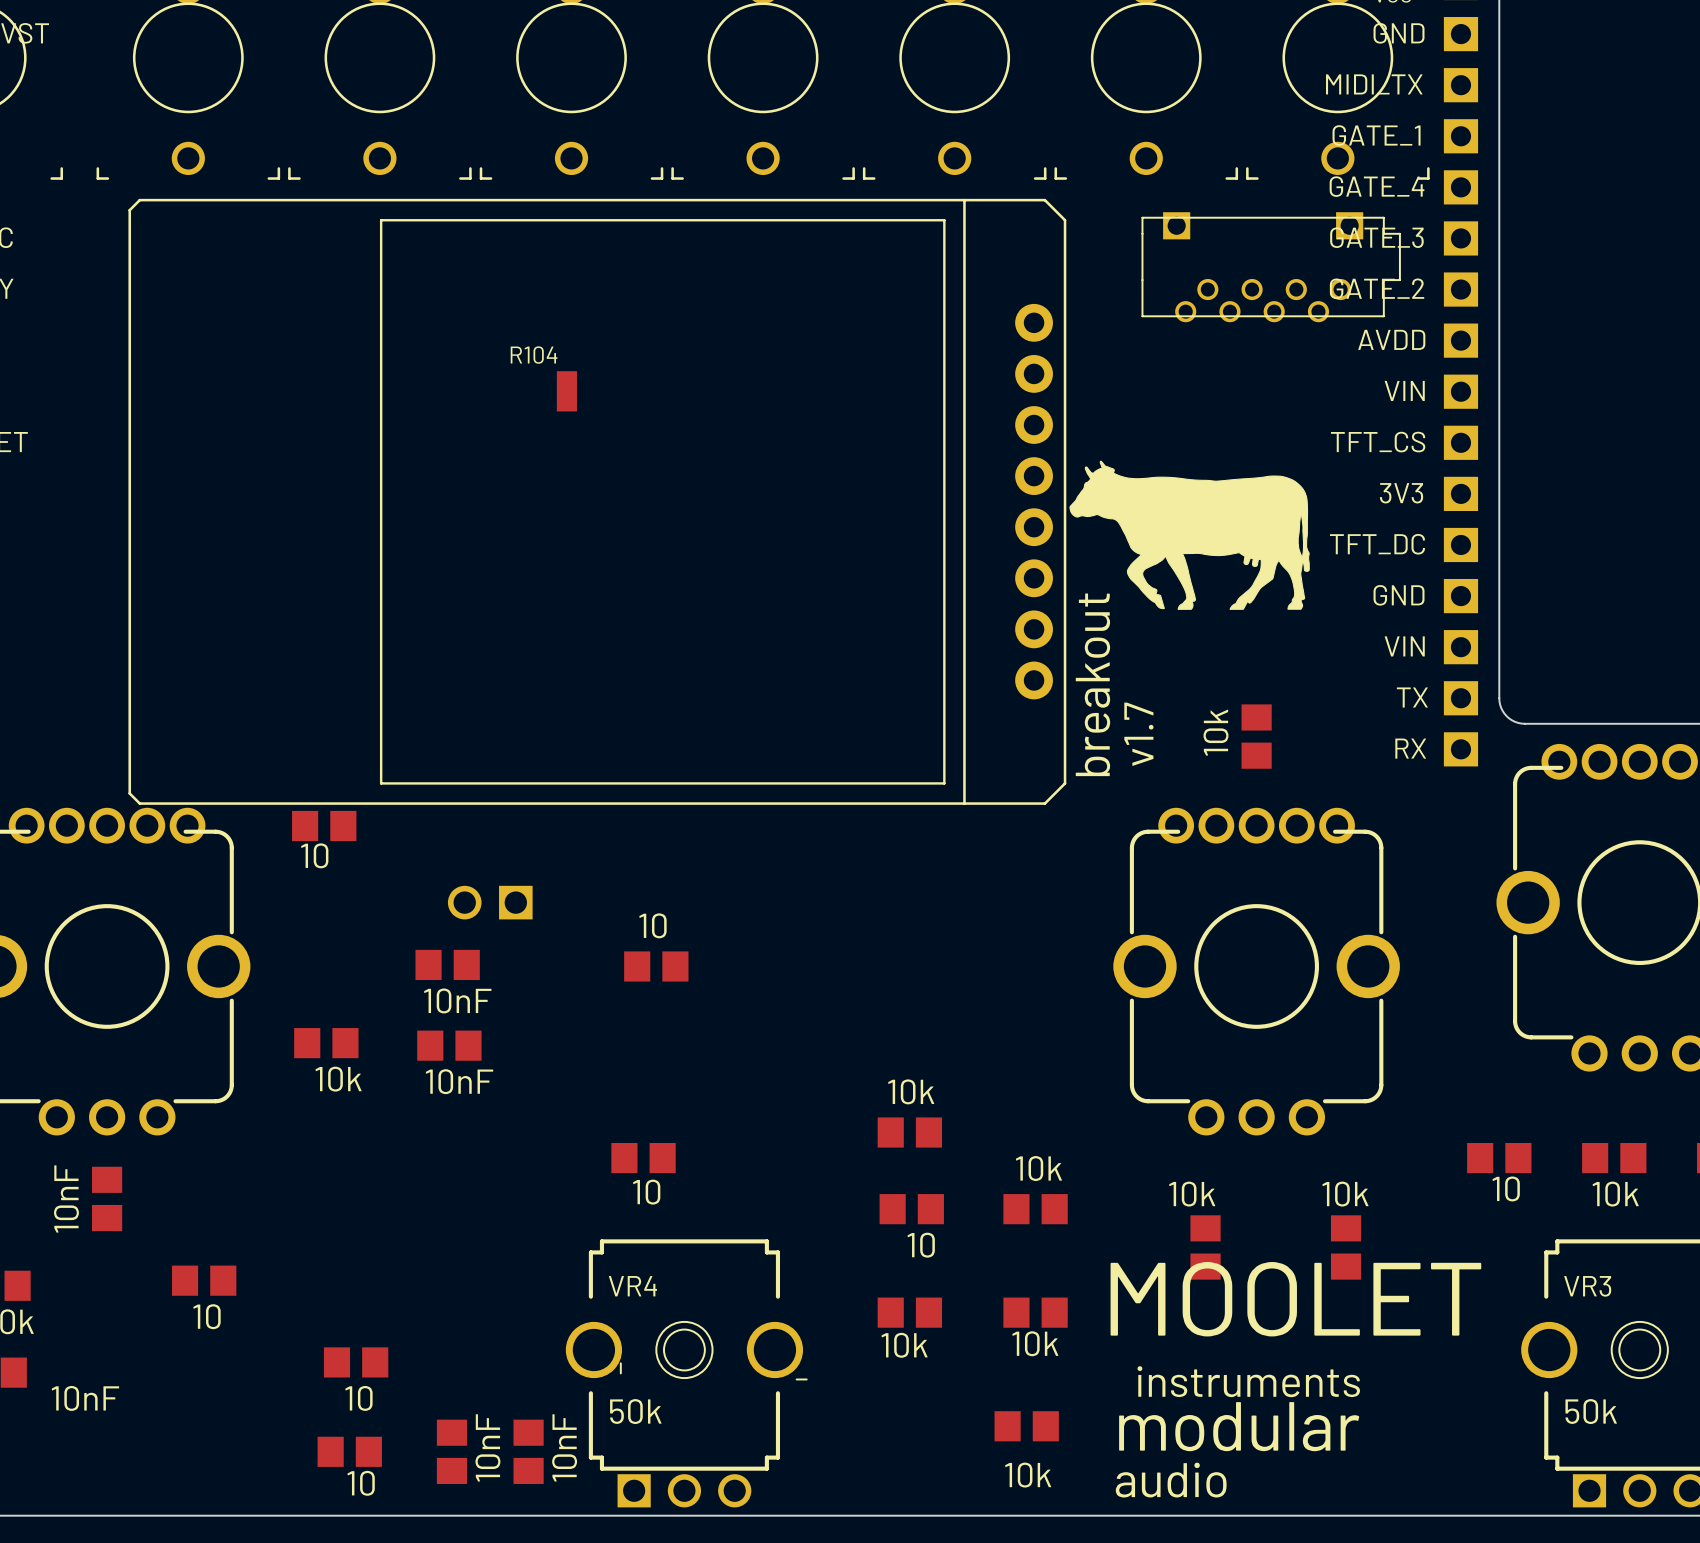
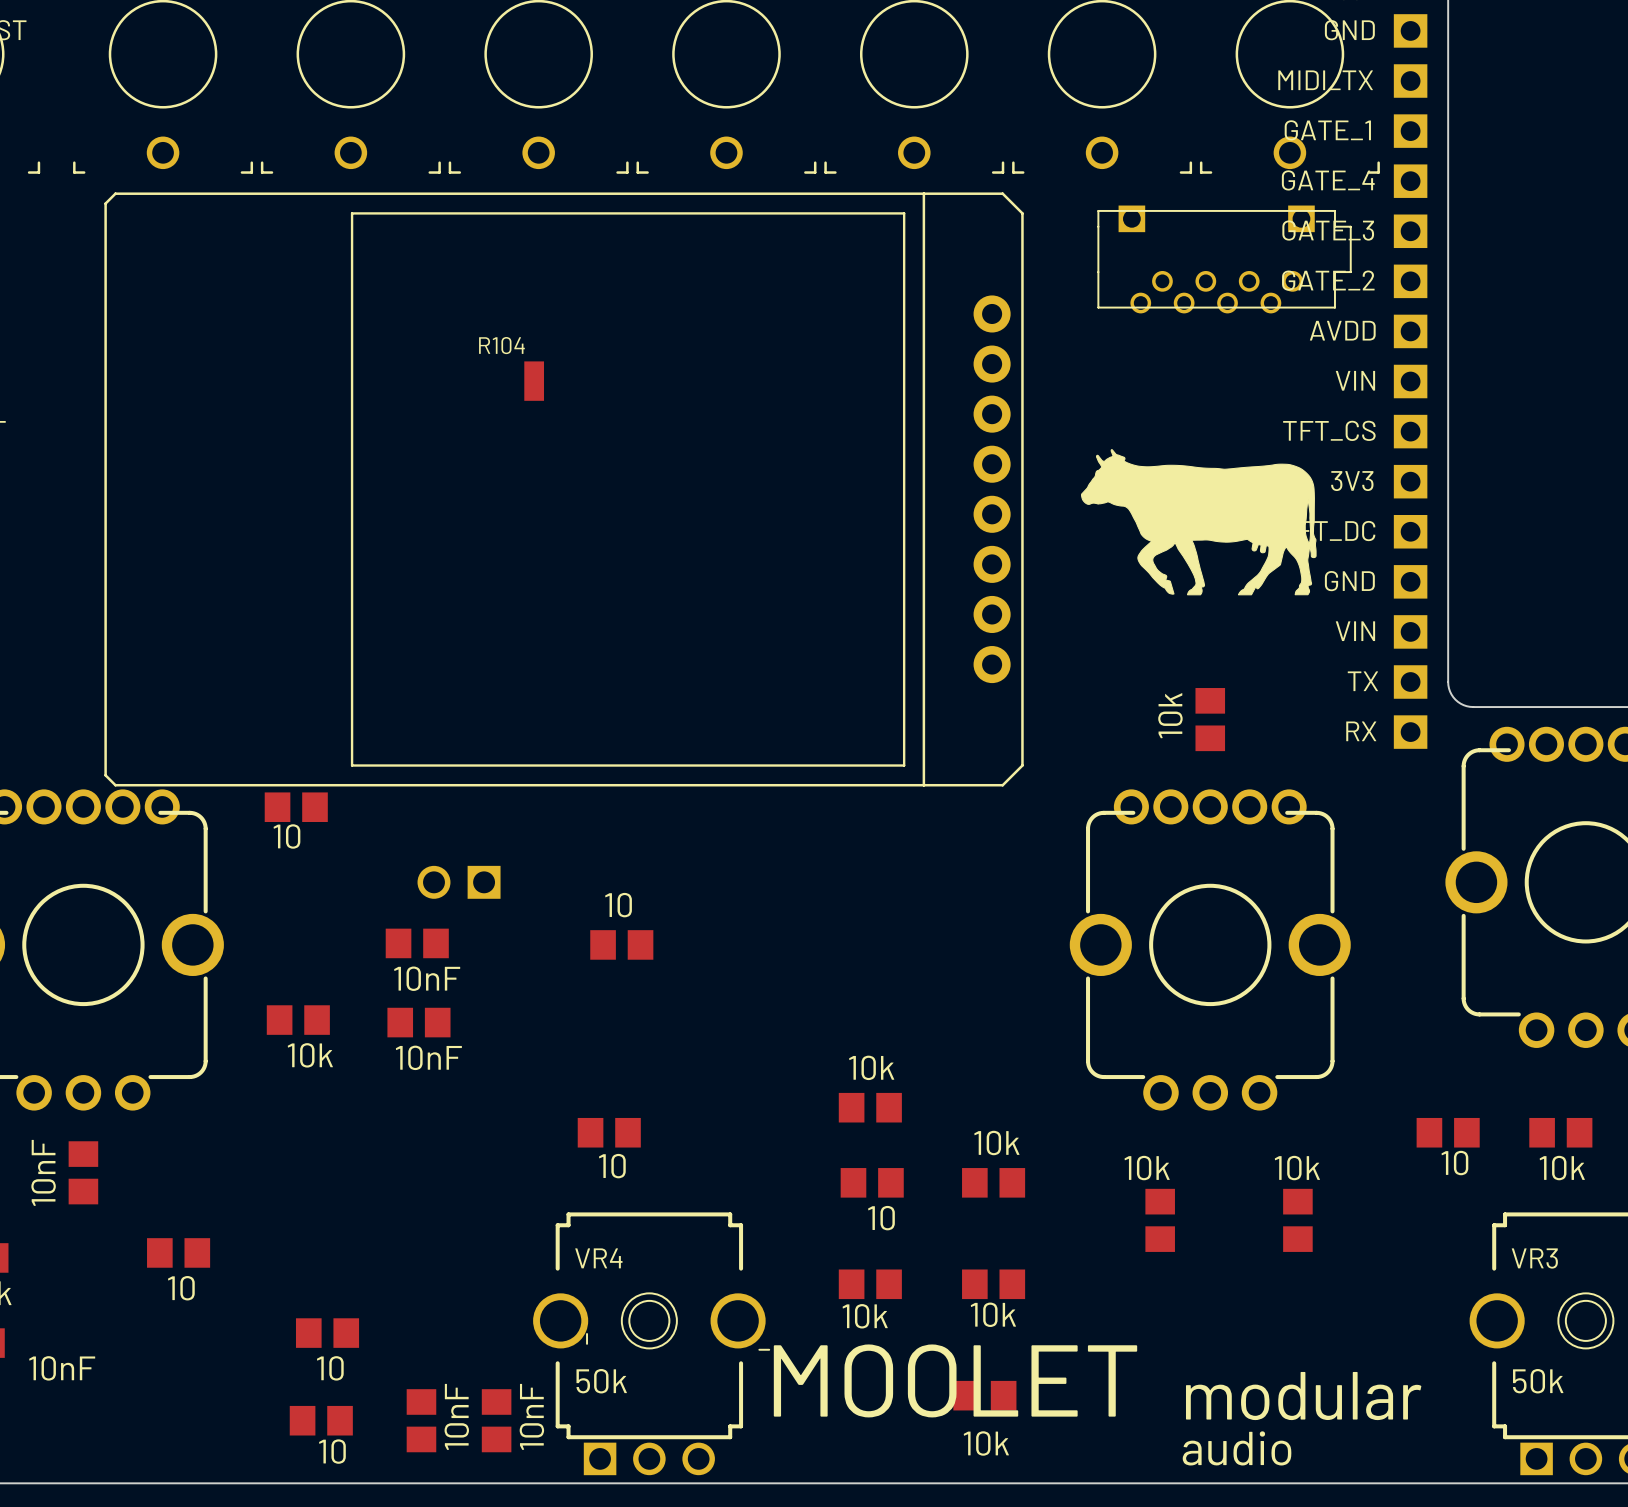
drawing position: (1189, 535) -> (1198, 522)
text: breakout (1092, 684) -> none
text: v1.7 (1138, 734) -> none
text position: MOOLET (1295, 1299) -> MOOLET (955, 1380)
text: instruments (1248, 1381) -> none
text position: modular (1239, 1426) -> modular (1303, 1396)
text position: audio (1171, 1480) -> audio (1237, 1448)

